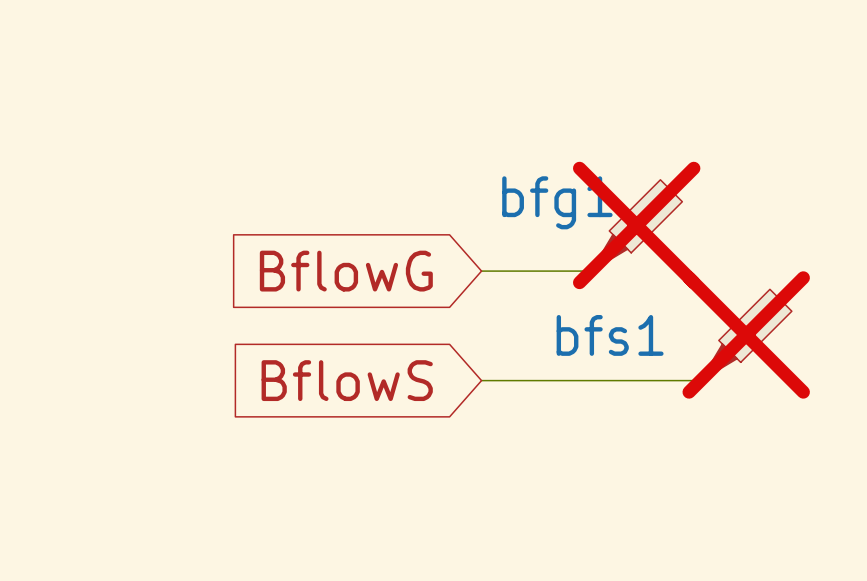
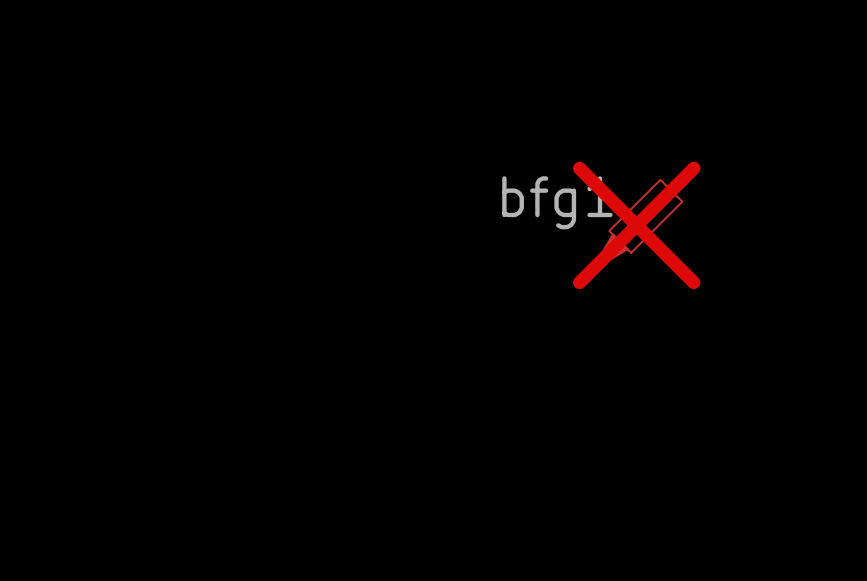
global label: BflowG (346, 271) -> none
wire: (481, 271) (591, 271) -> none
bfs1: (746, 334) -> none
global label: BflowS (347, 380) -> none
wire: (481, 380) (700, 380) -> none

